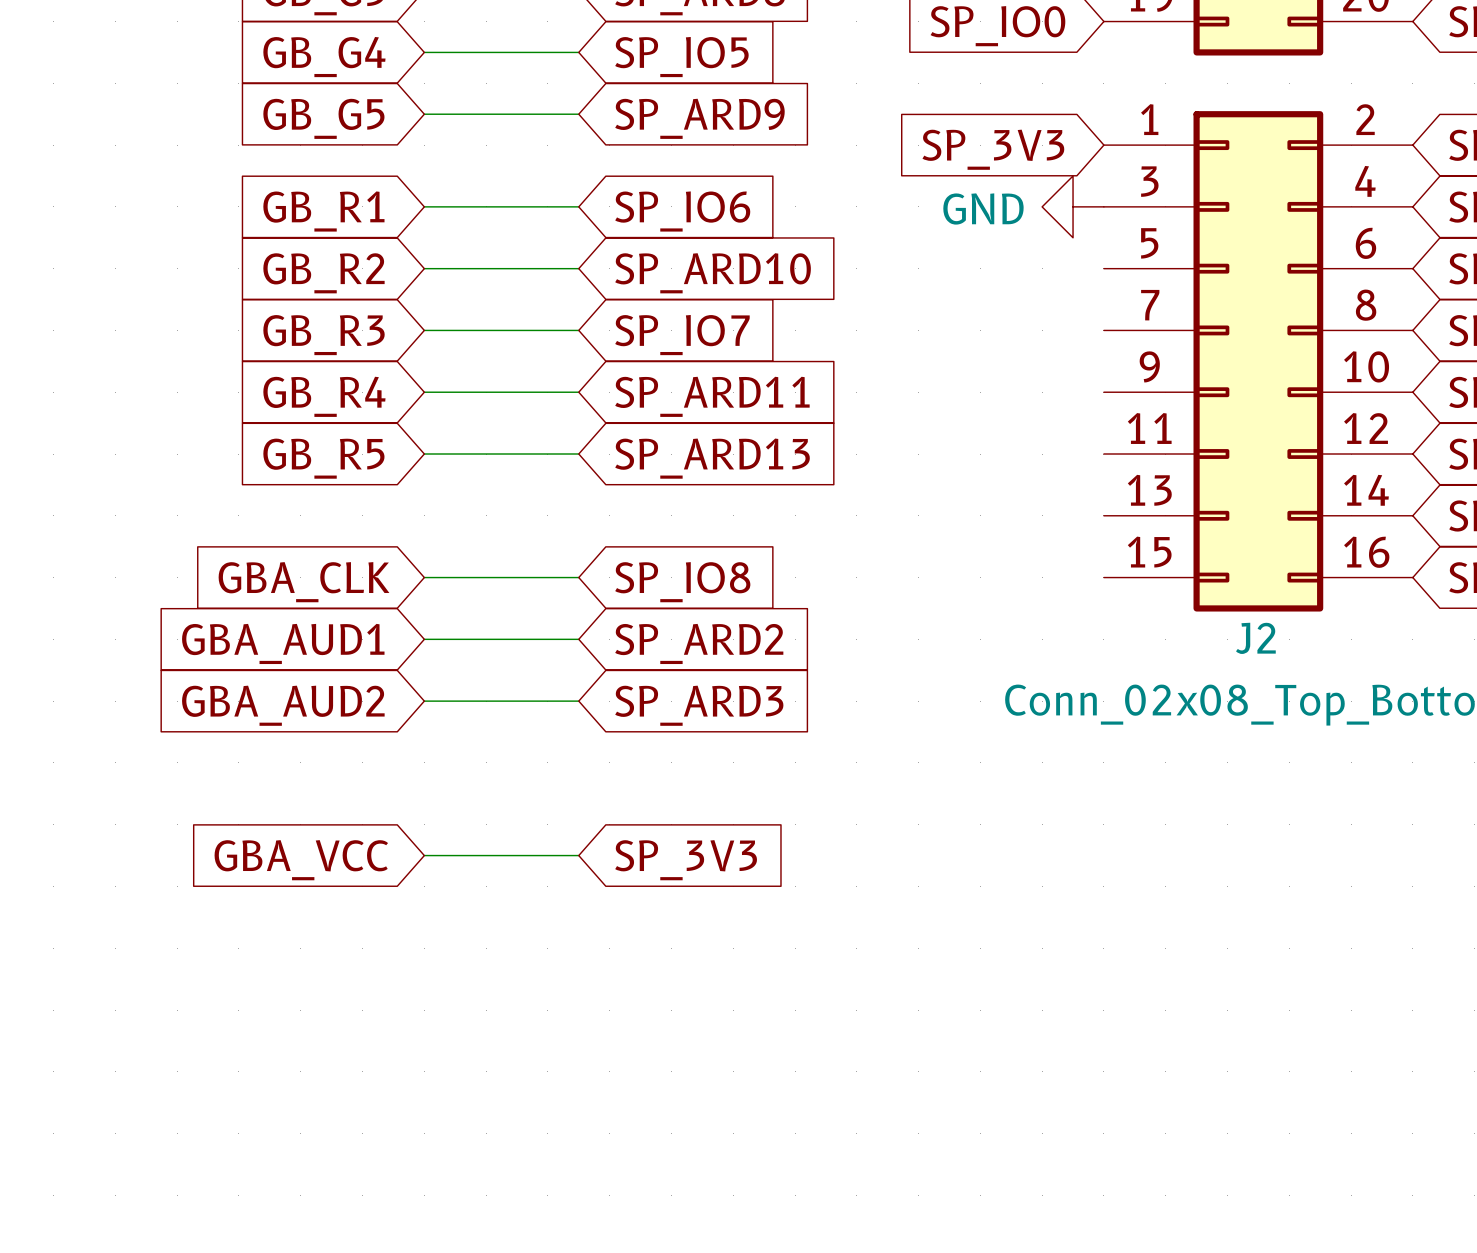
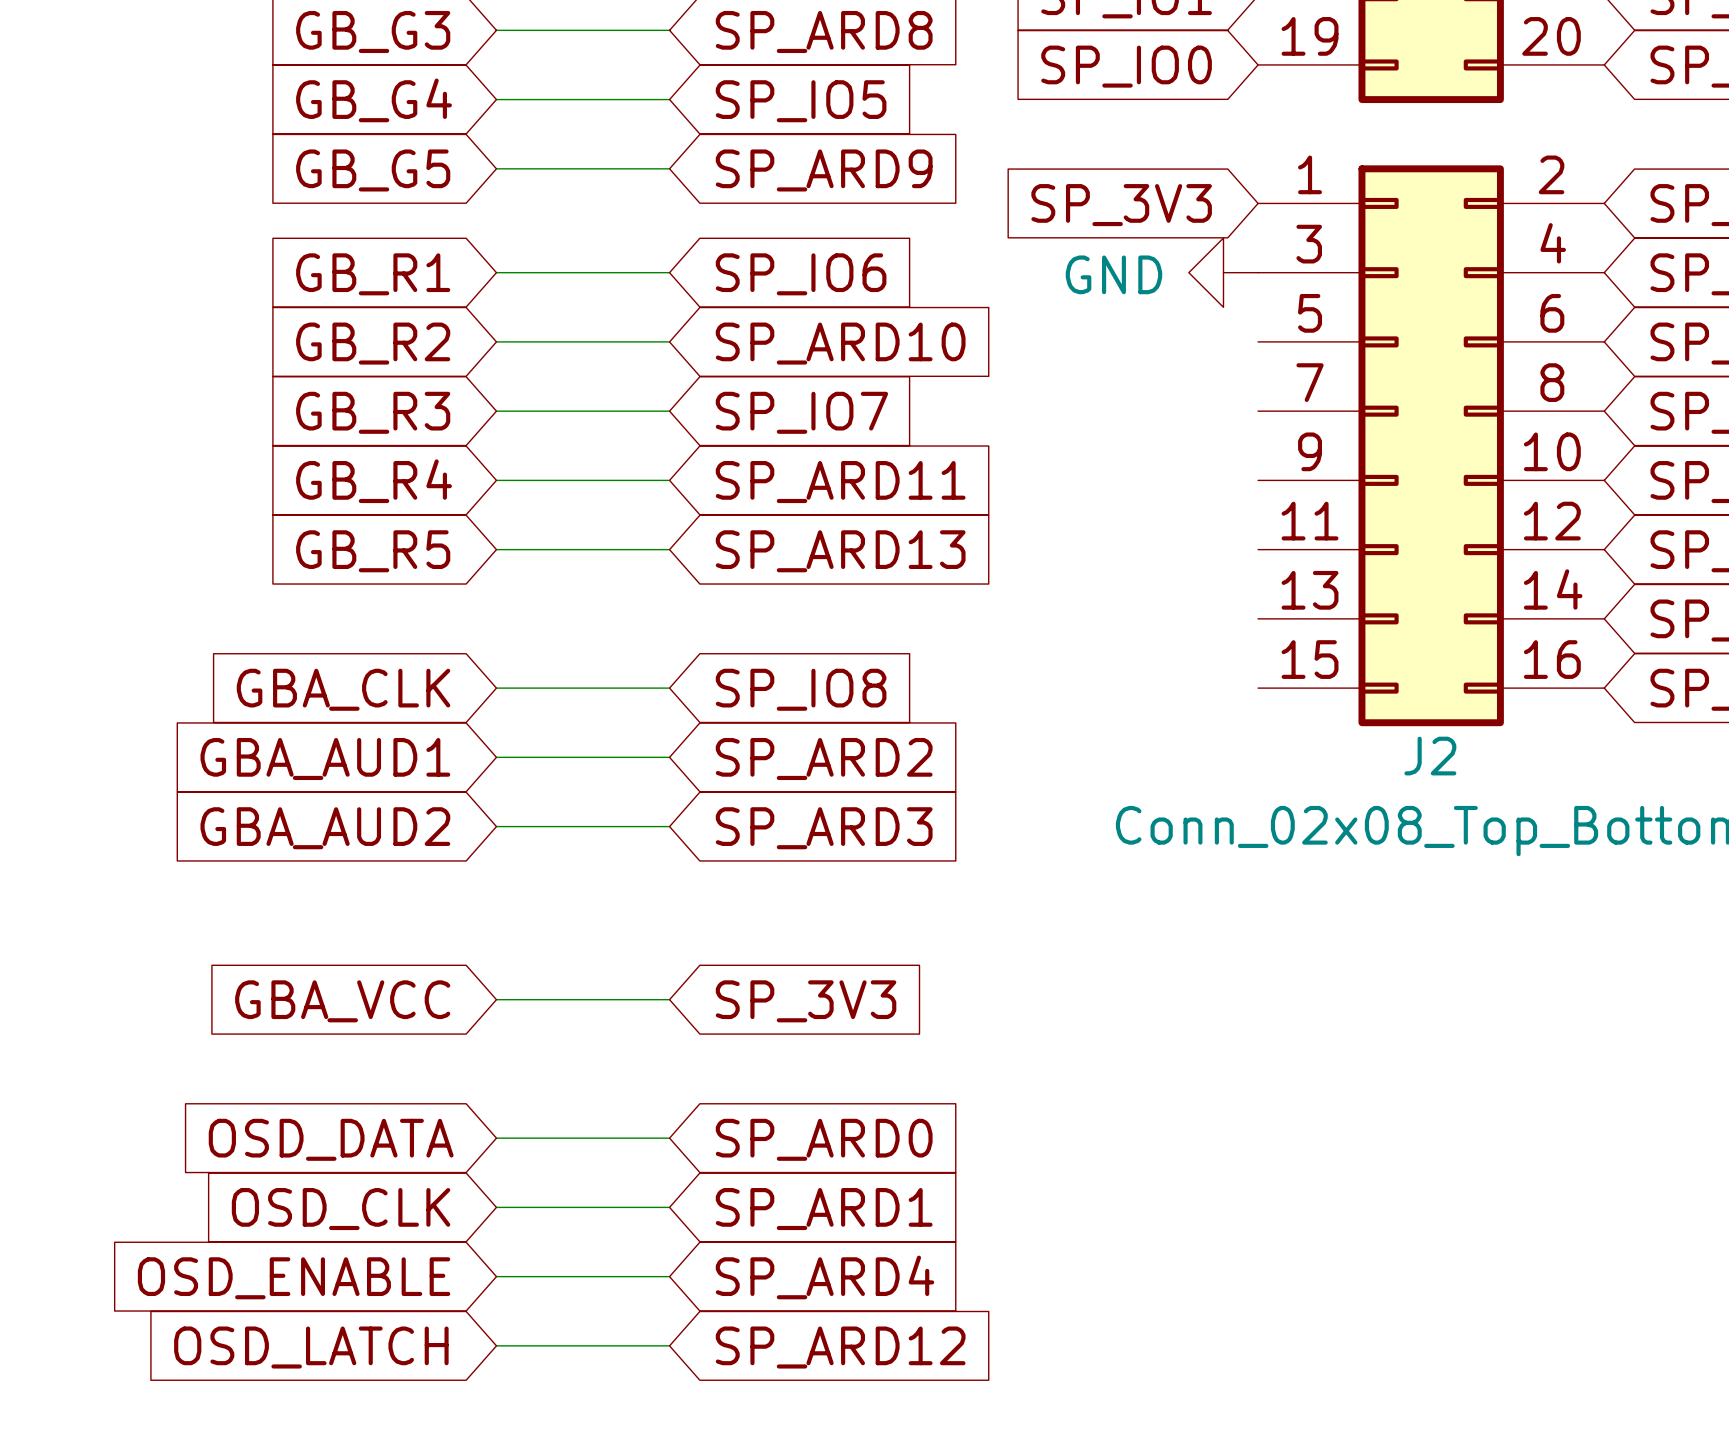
wire: none -> (496, 1138) (669, 1138)
global label: none -> OSD_DATA (331, 1139)
global label: none -> SP_ARD0 (824, 1139)
wire: none -> (496, 1207) (669, 1207)
global label: none -> OSD_CLK (341, 1209)
global label: none -> SP_ARD1 (824, 1209)
wire: none -> (496, 1276) (669, 1276)
global label: none -> OSD_ENABLE (294, 1278)
global label: none -> SP_ARD4 (824, 1277)
wire: none -> (496, 1345) (669, 1345)
global label: none -> OSD_LATCH (311, 1347)
global label: none -> SP_ARD12 (840, 1347)

